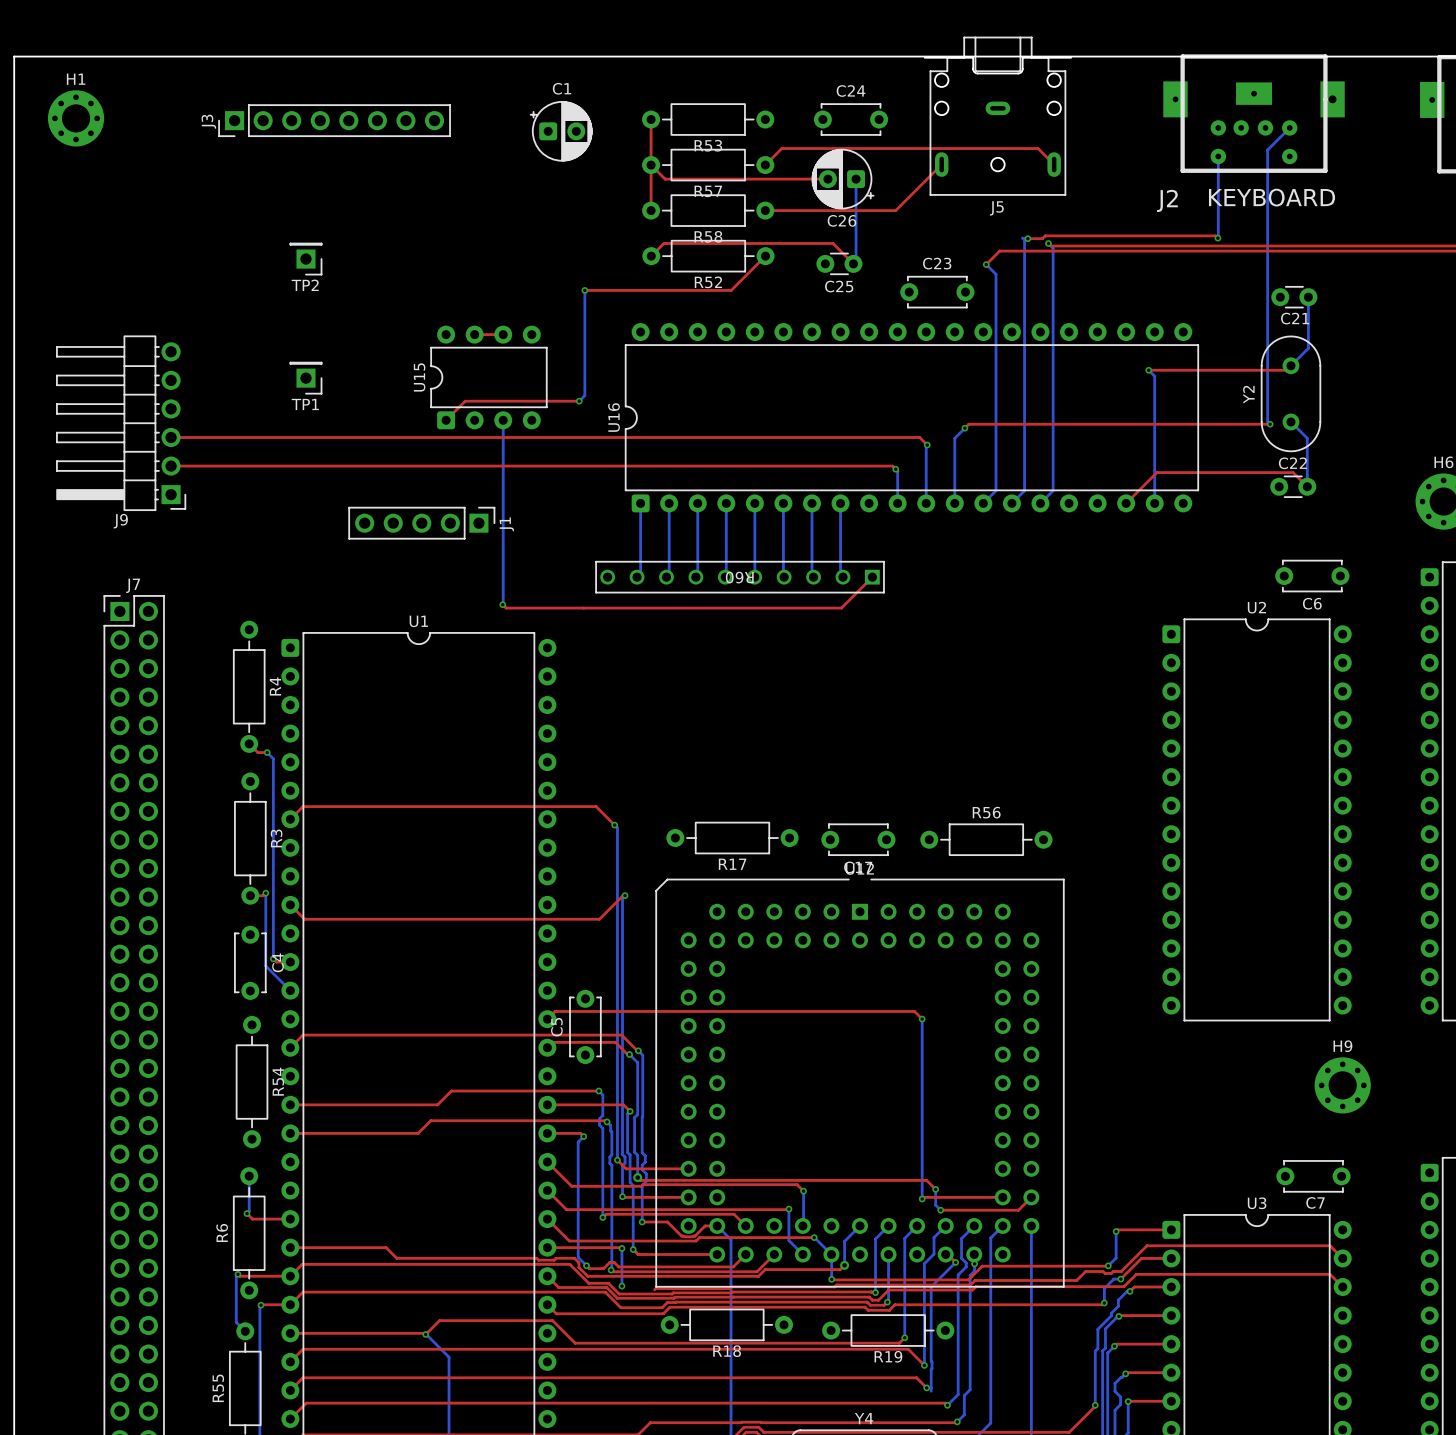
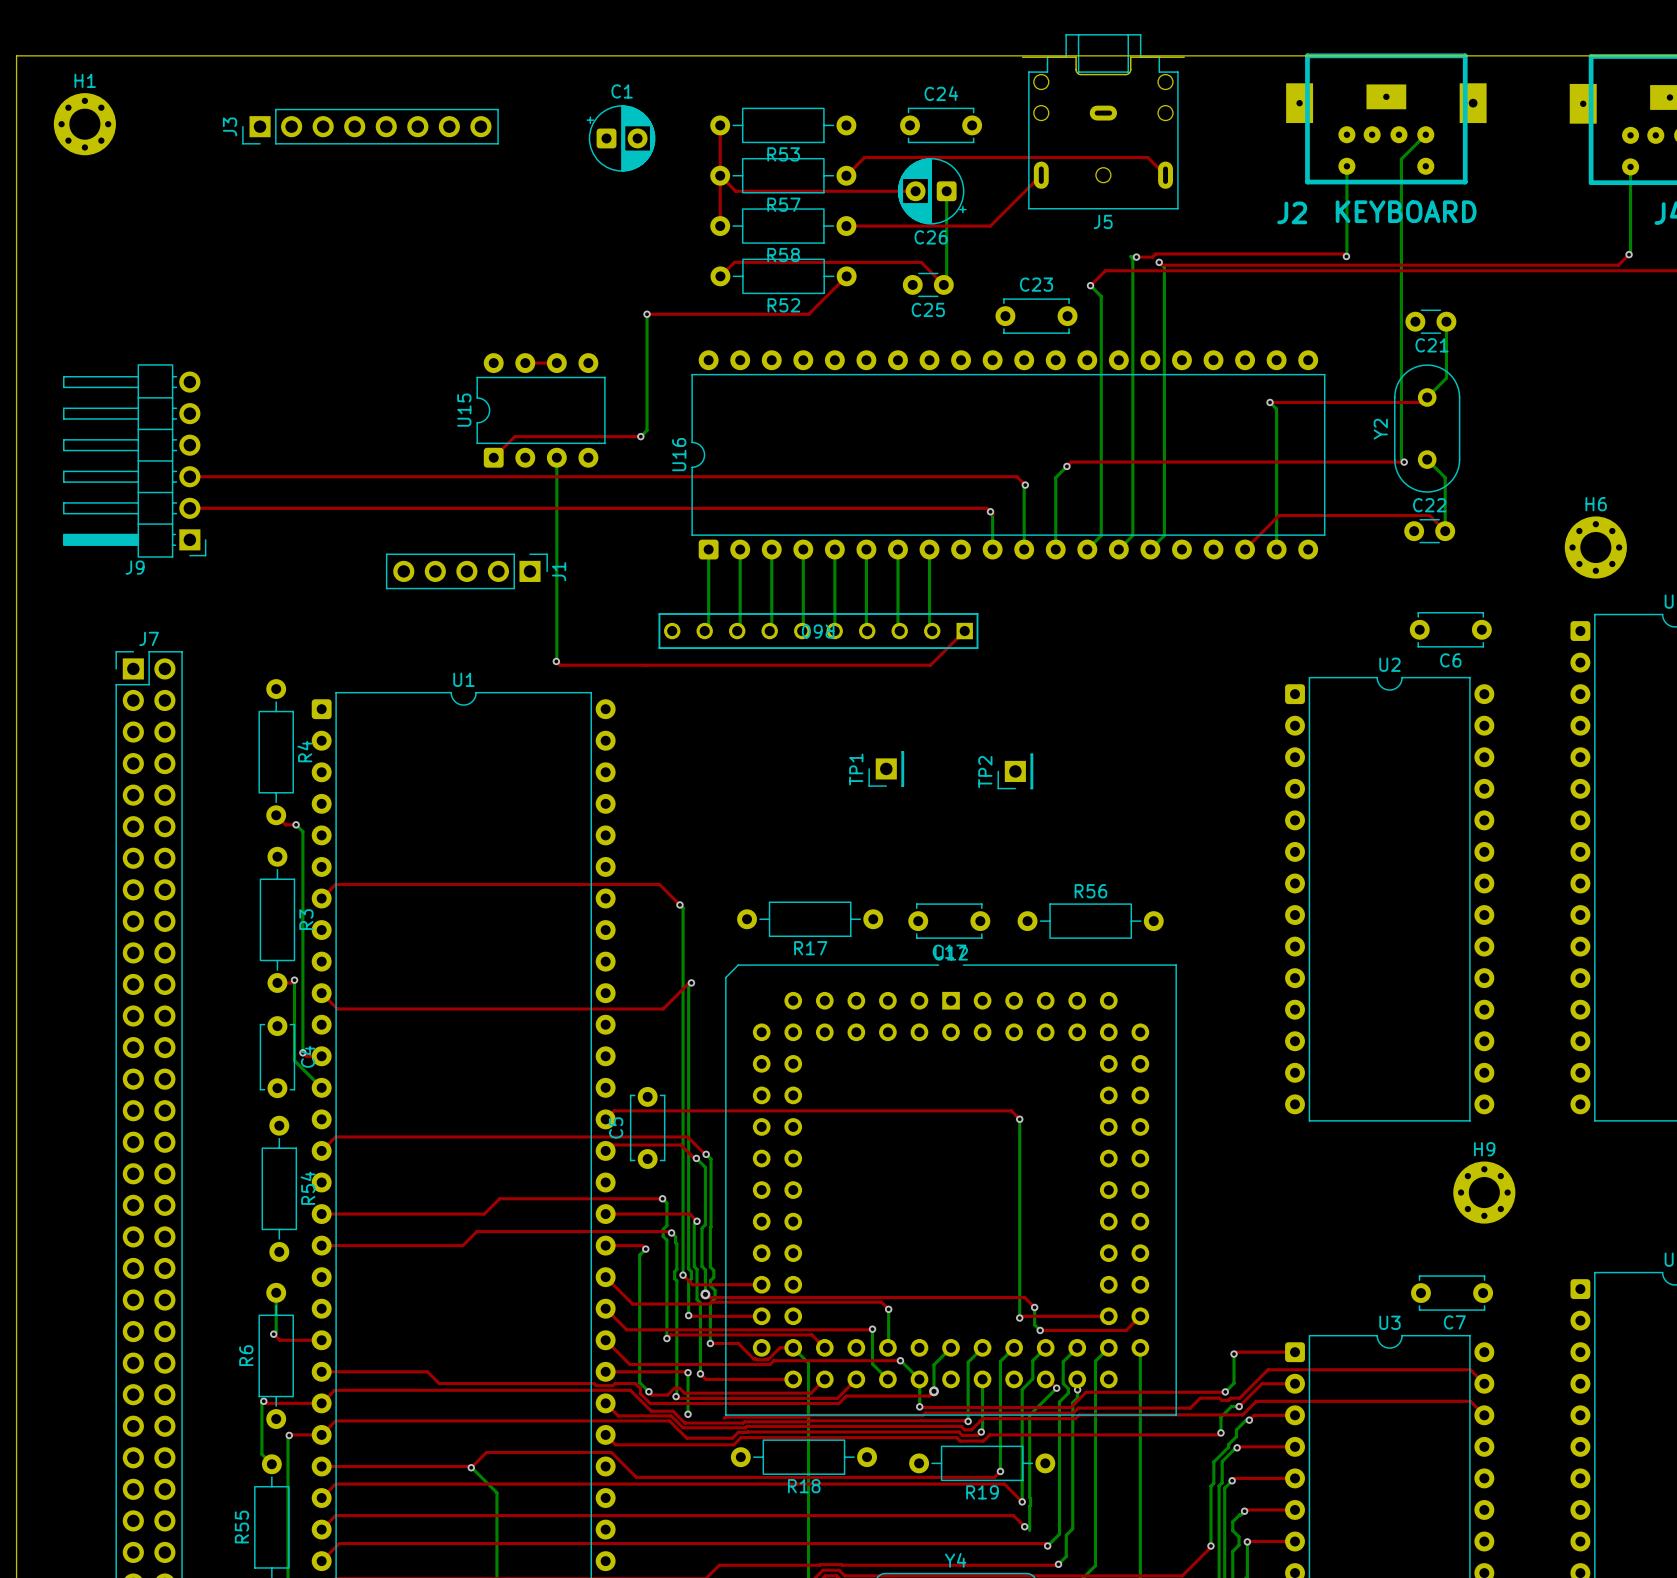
TP2 rotation: 0° (305, 259) -> 90° clockwise (1015, 771)
TP2 position: (305, 259) -> (1015, 771)
TP1 rotation: 0° (305, 378) -> 90° clockwise (886, 768)
TP1 position: (305, 378) -> (886, 768)

